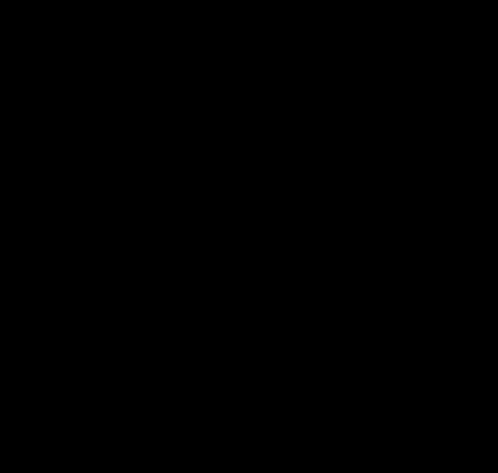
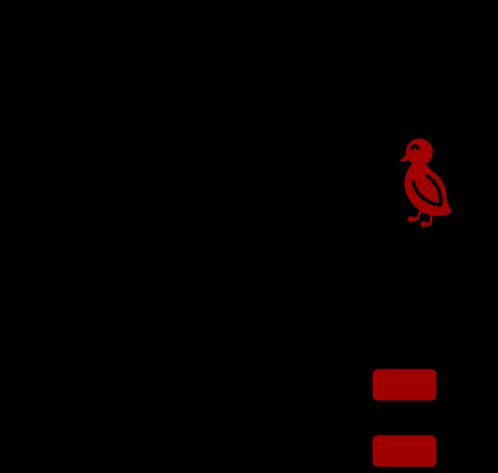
part: none -> (425, 182)
part: none -> (404, 384)
part: none -> (404, 451)

